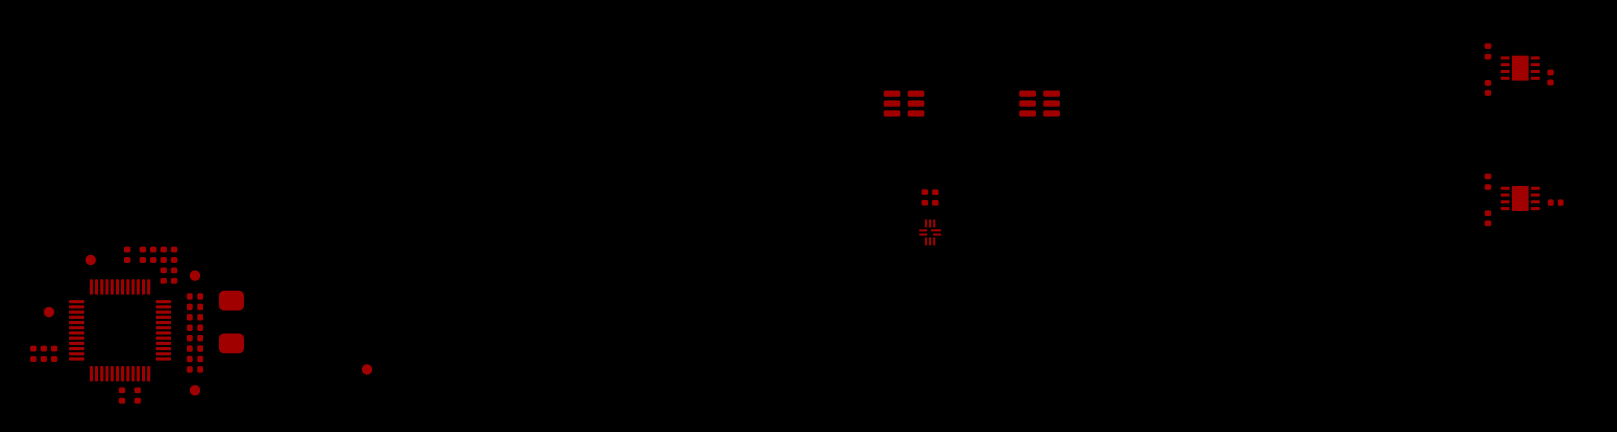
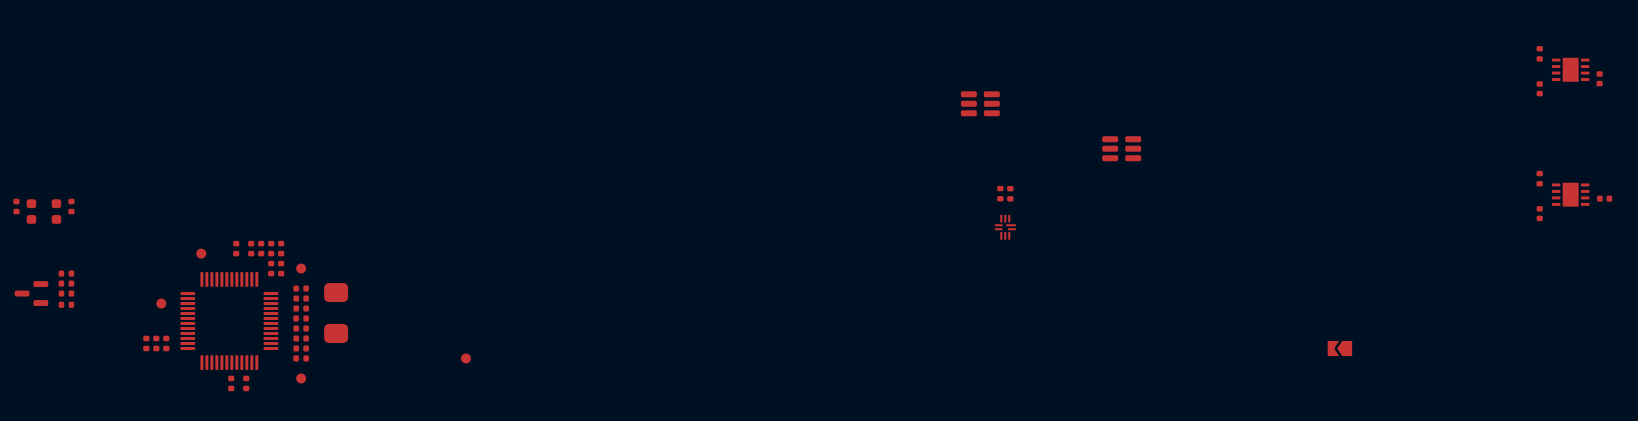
part position: (1039, 103) -> (1121, 148)
part: none -> (1339, 348)

